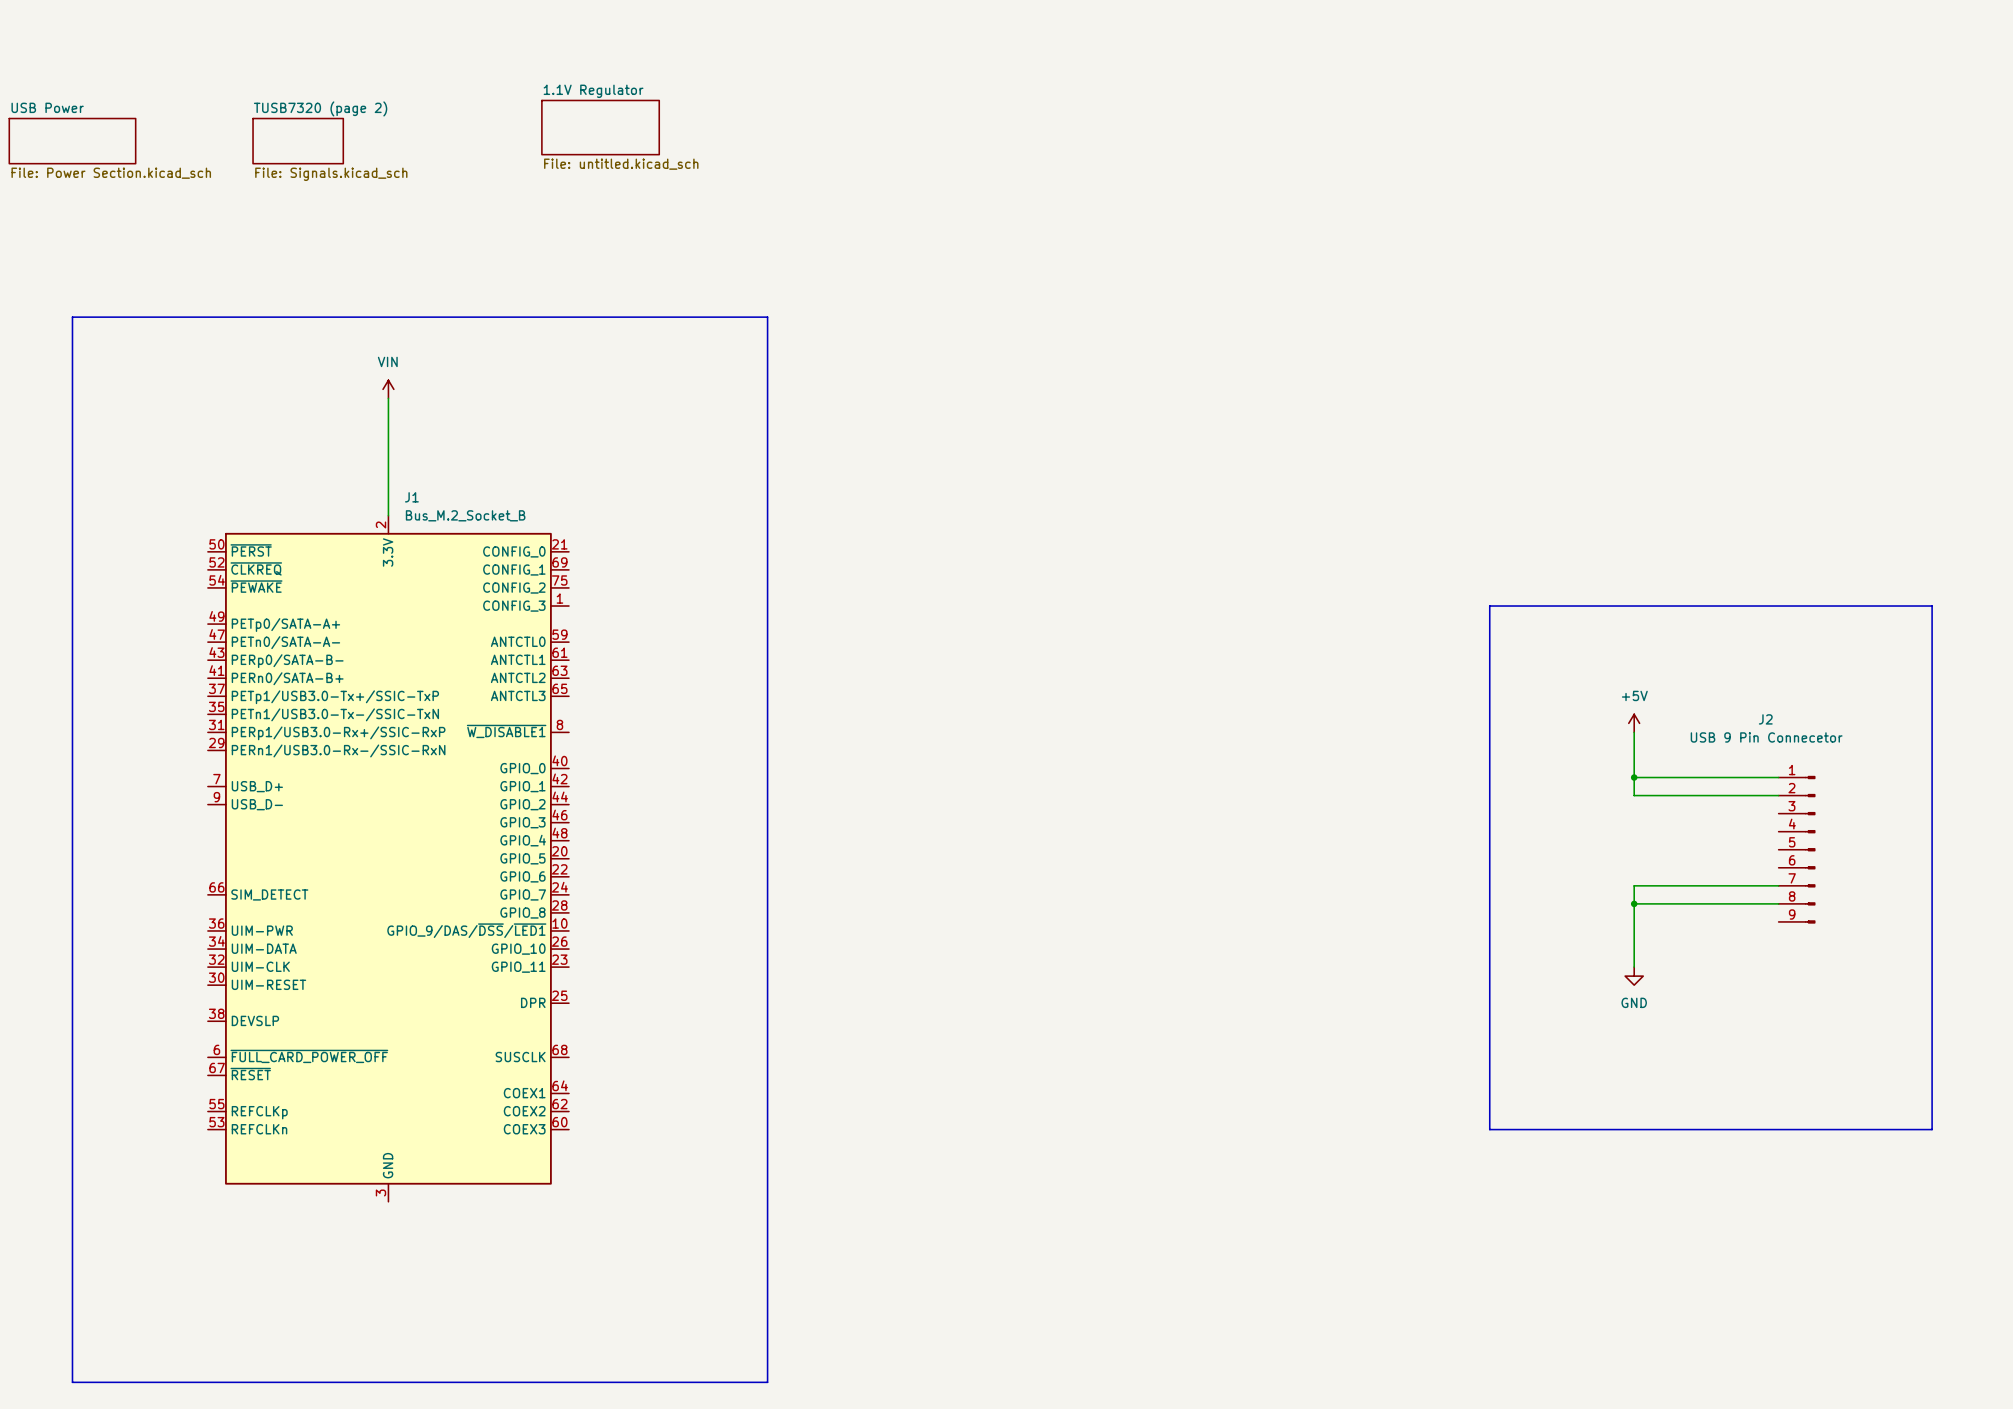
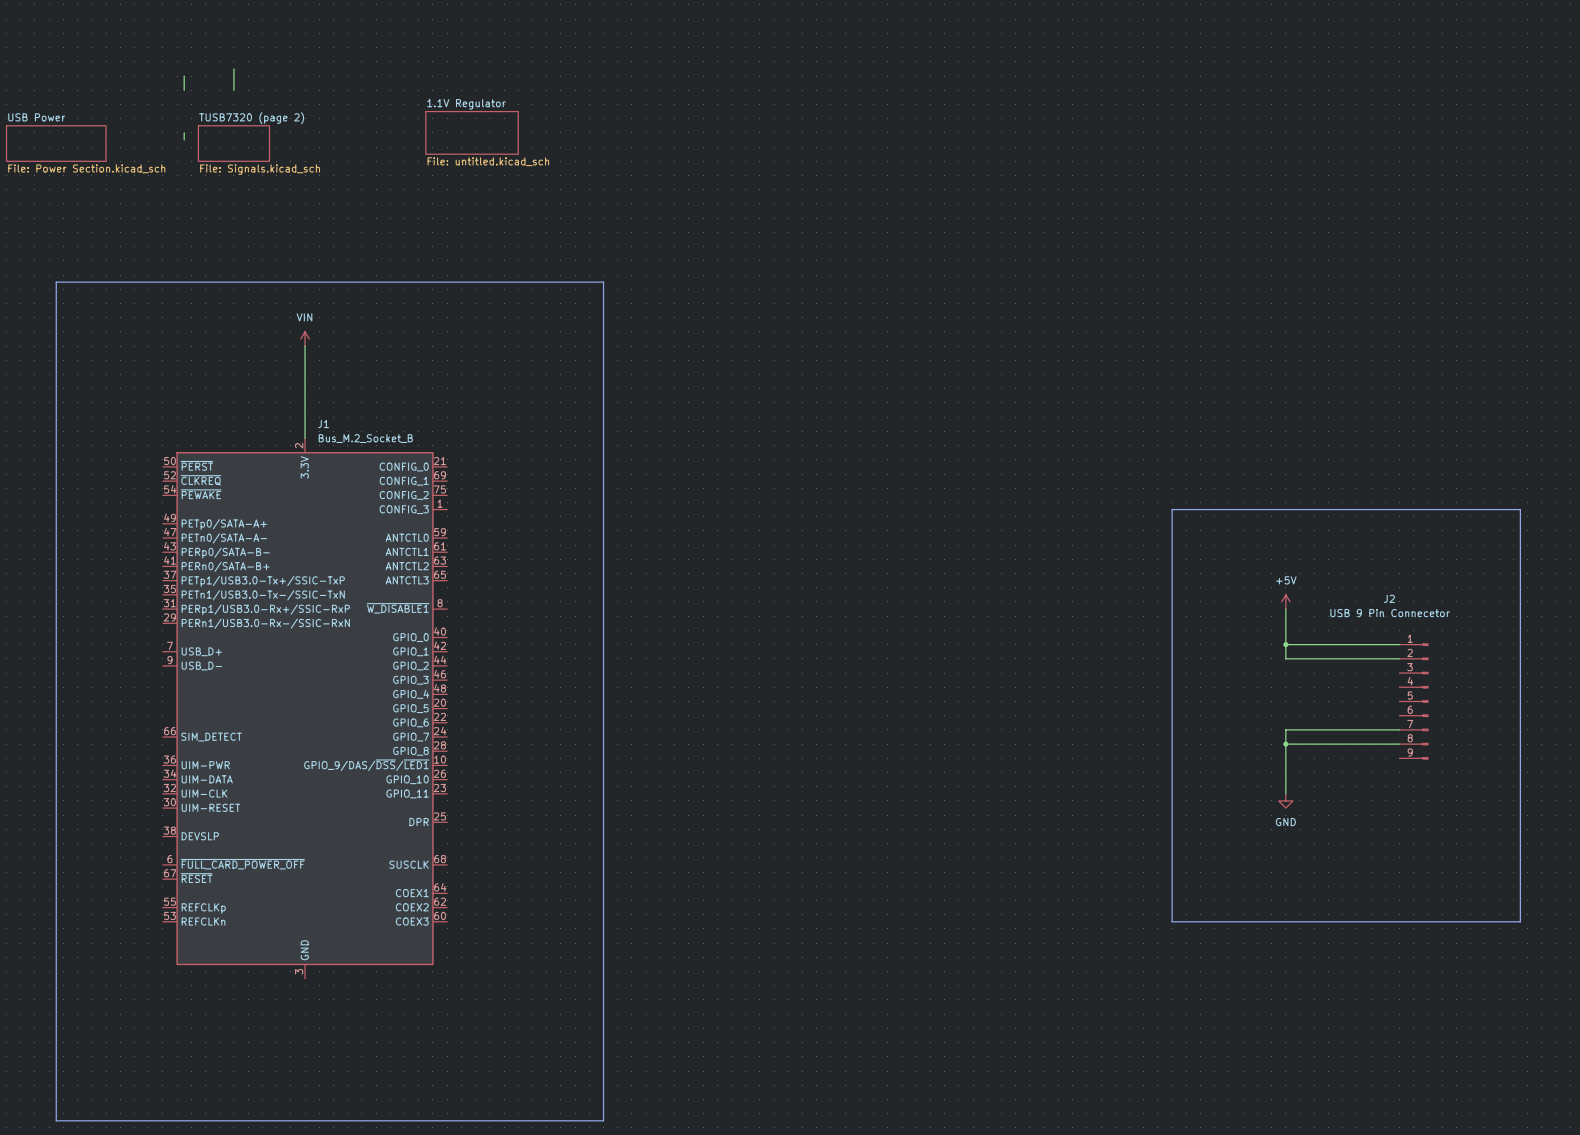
wire: none -> (233, 68) (233, 90)
wire: none -> (184, 76) (184, 90)
wire: none -> (184, 132) (184, 139)

